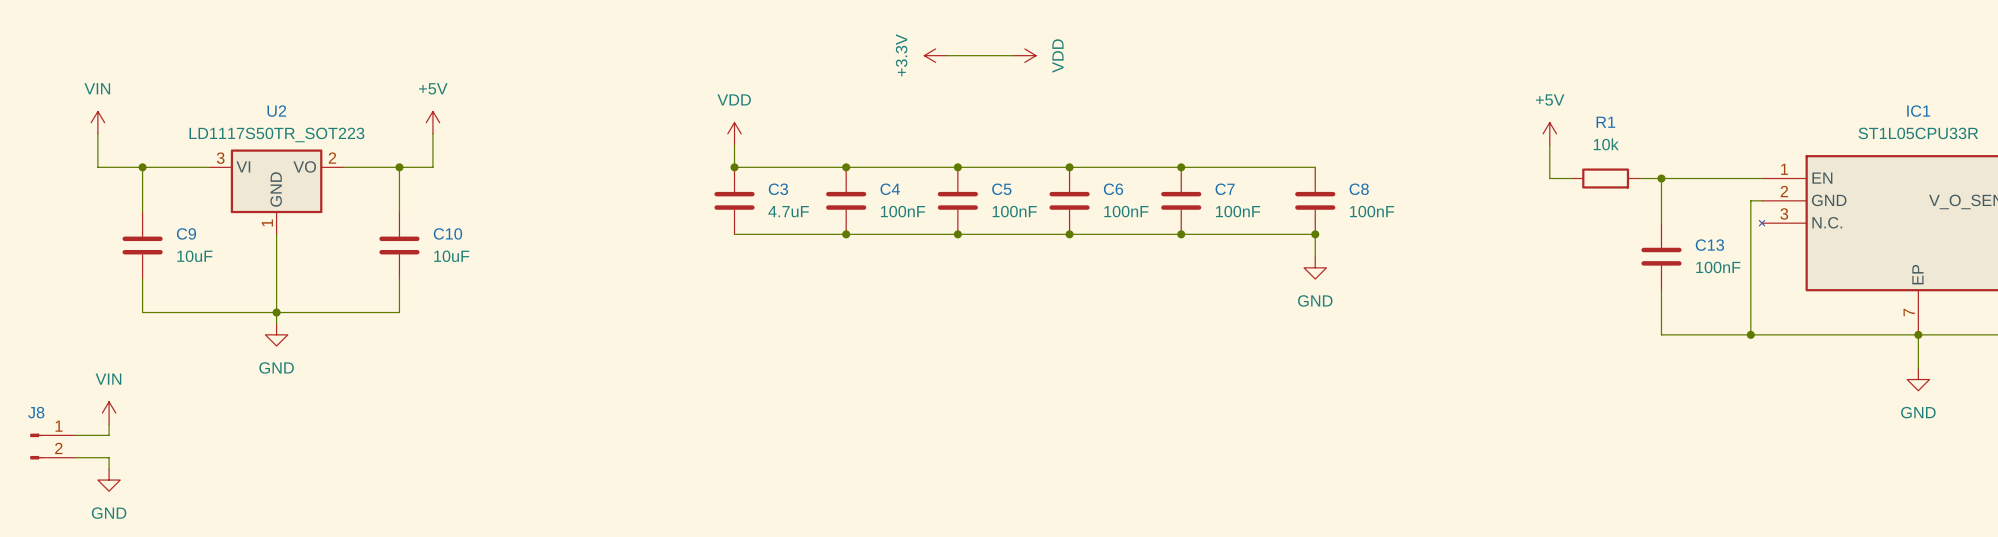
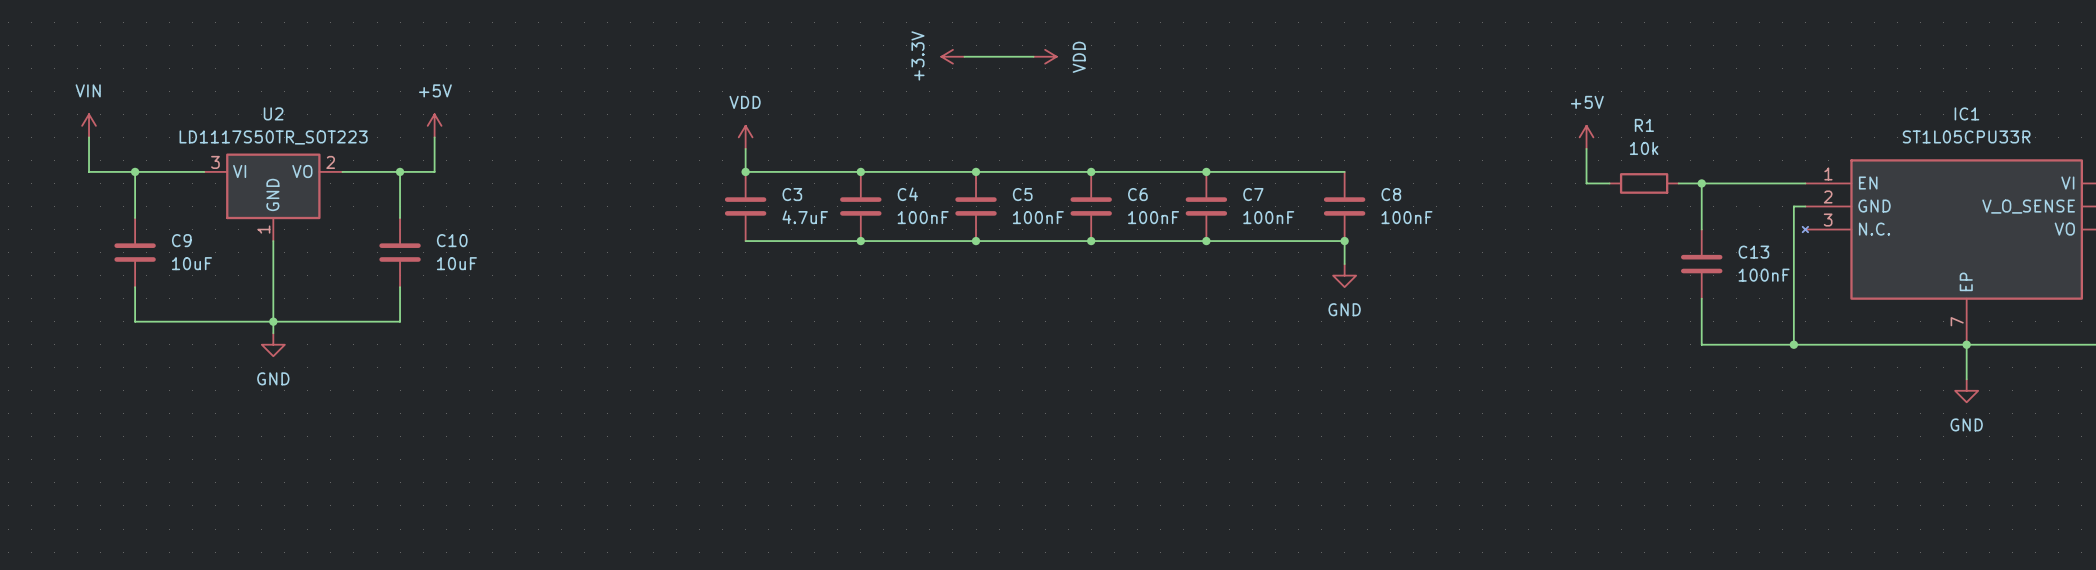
power symbol: VIN (109, 413) -> none
wire: (109, 424) (109, 435) (75, 435) -> none
J8: (52, 446) -> none
wire: (75, 457) (109, 457) (109, 468) -> none
power symbol: GND (109, 480) -> none

